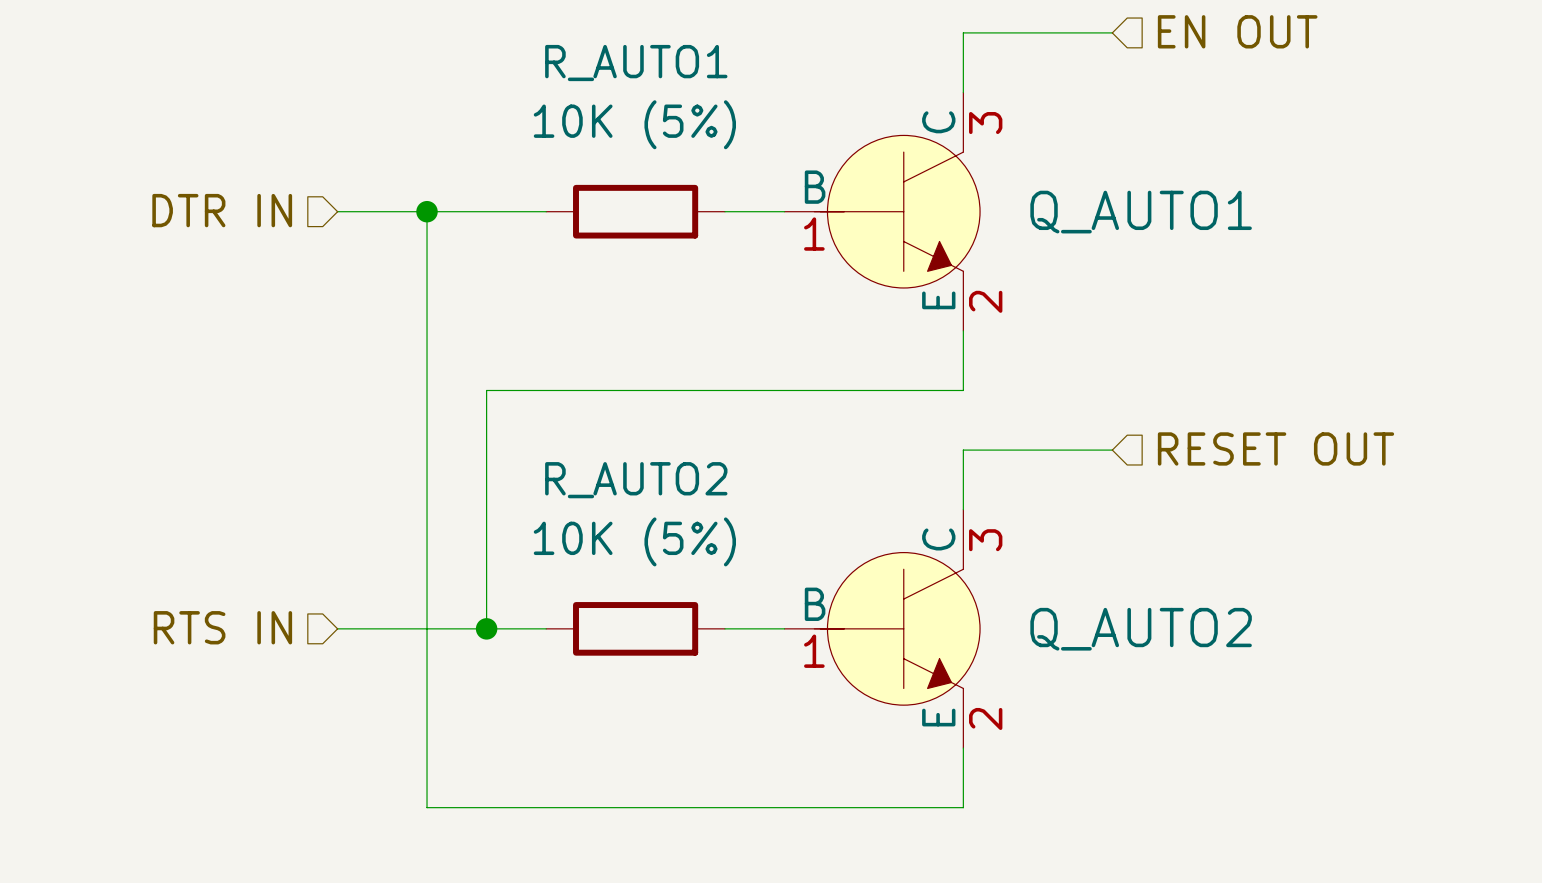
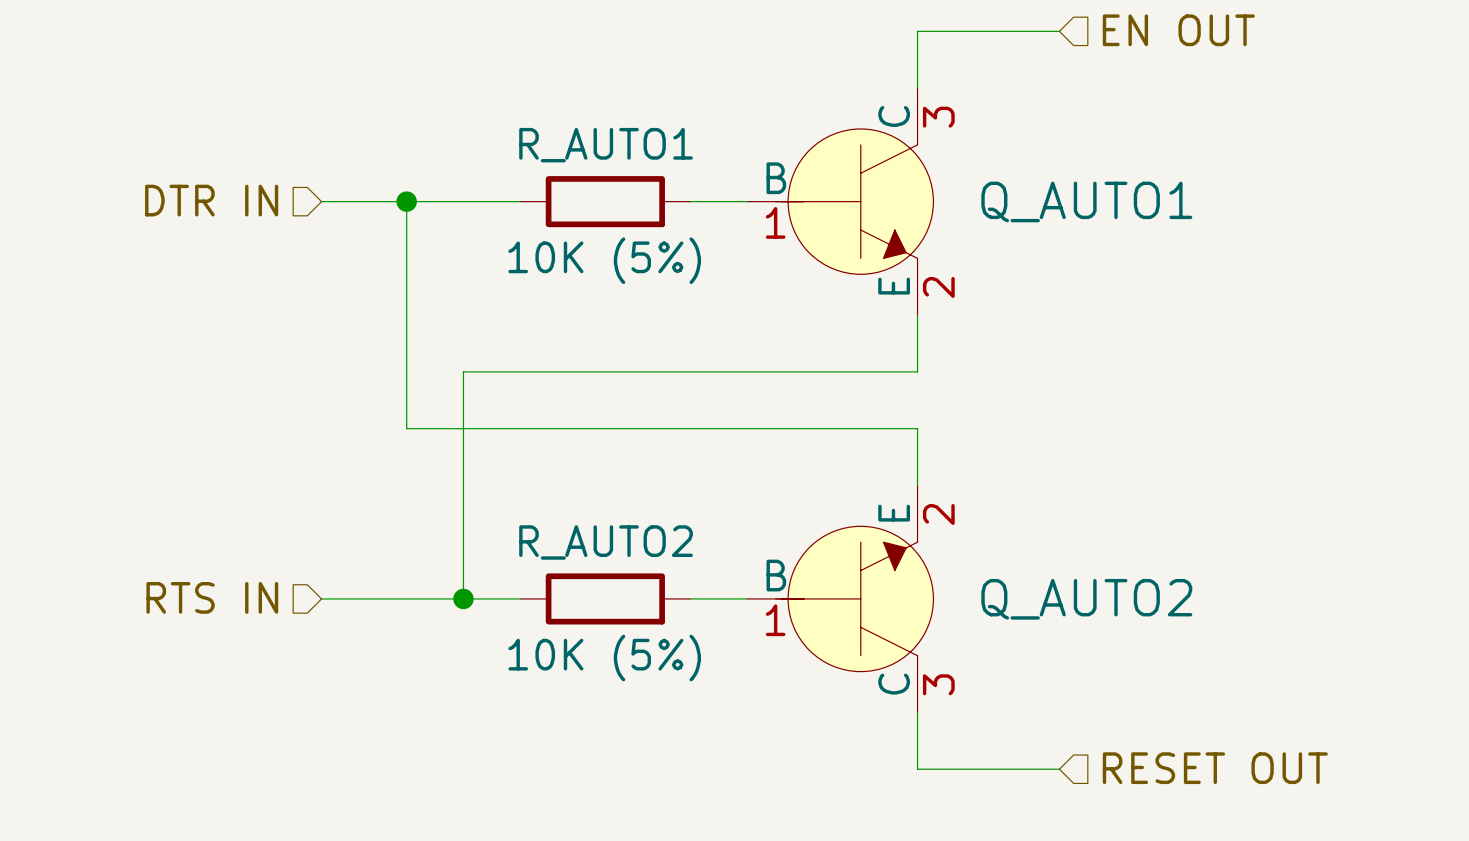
R_AUTO1 name position: R_AUTO1 (636, 63) -> R_AUTO1 (606, 145)
R_AUTO1 value position: 10K (5%) (634, 124) -> 10K (5%) (604, 260)
hierarchical label position: RESET OUT (1275, 448) -> RESET OUT (1215, 768)
wire: (427, 450) (427, 807) (963, 807) -> (406, 428) (917, 428)
wire: (963, 450) (1112, 450) -> (917, 769) (1059, 769)
R_AUTO2 name position: R_AUTO2 (636, 480) -> R_AUTO2 (606, 542)
R_AUTO2 value position: 10K (5%) (634, 541) -> 10K (5%) (604, 658)
Q_AUTO2 flip: as is (897, 628) -> up-down (854, 598)

